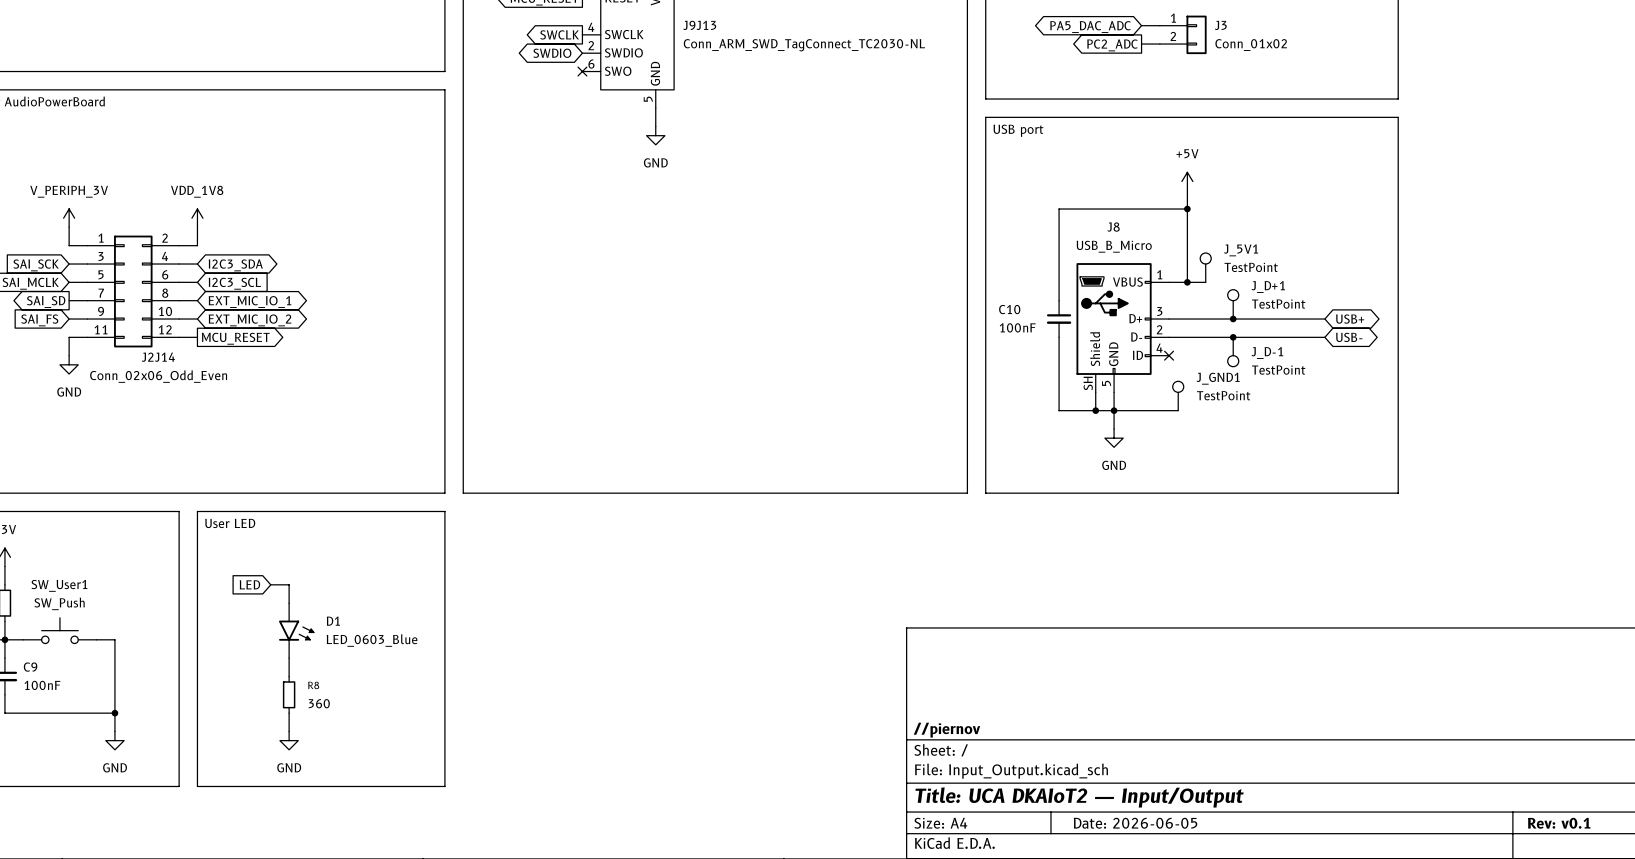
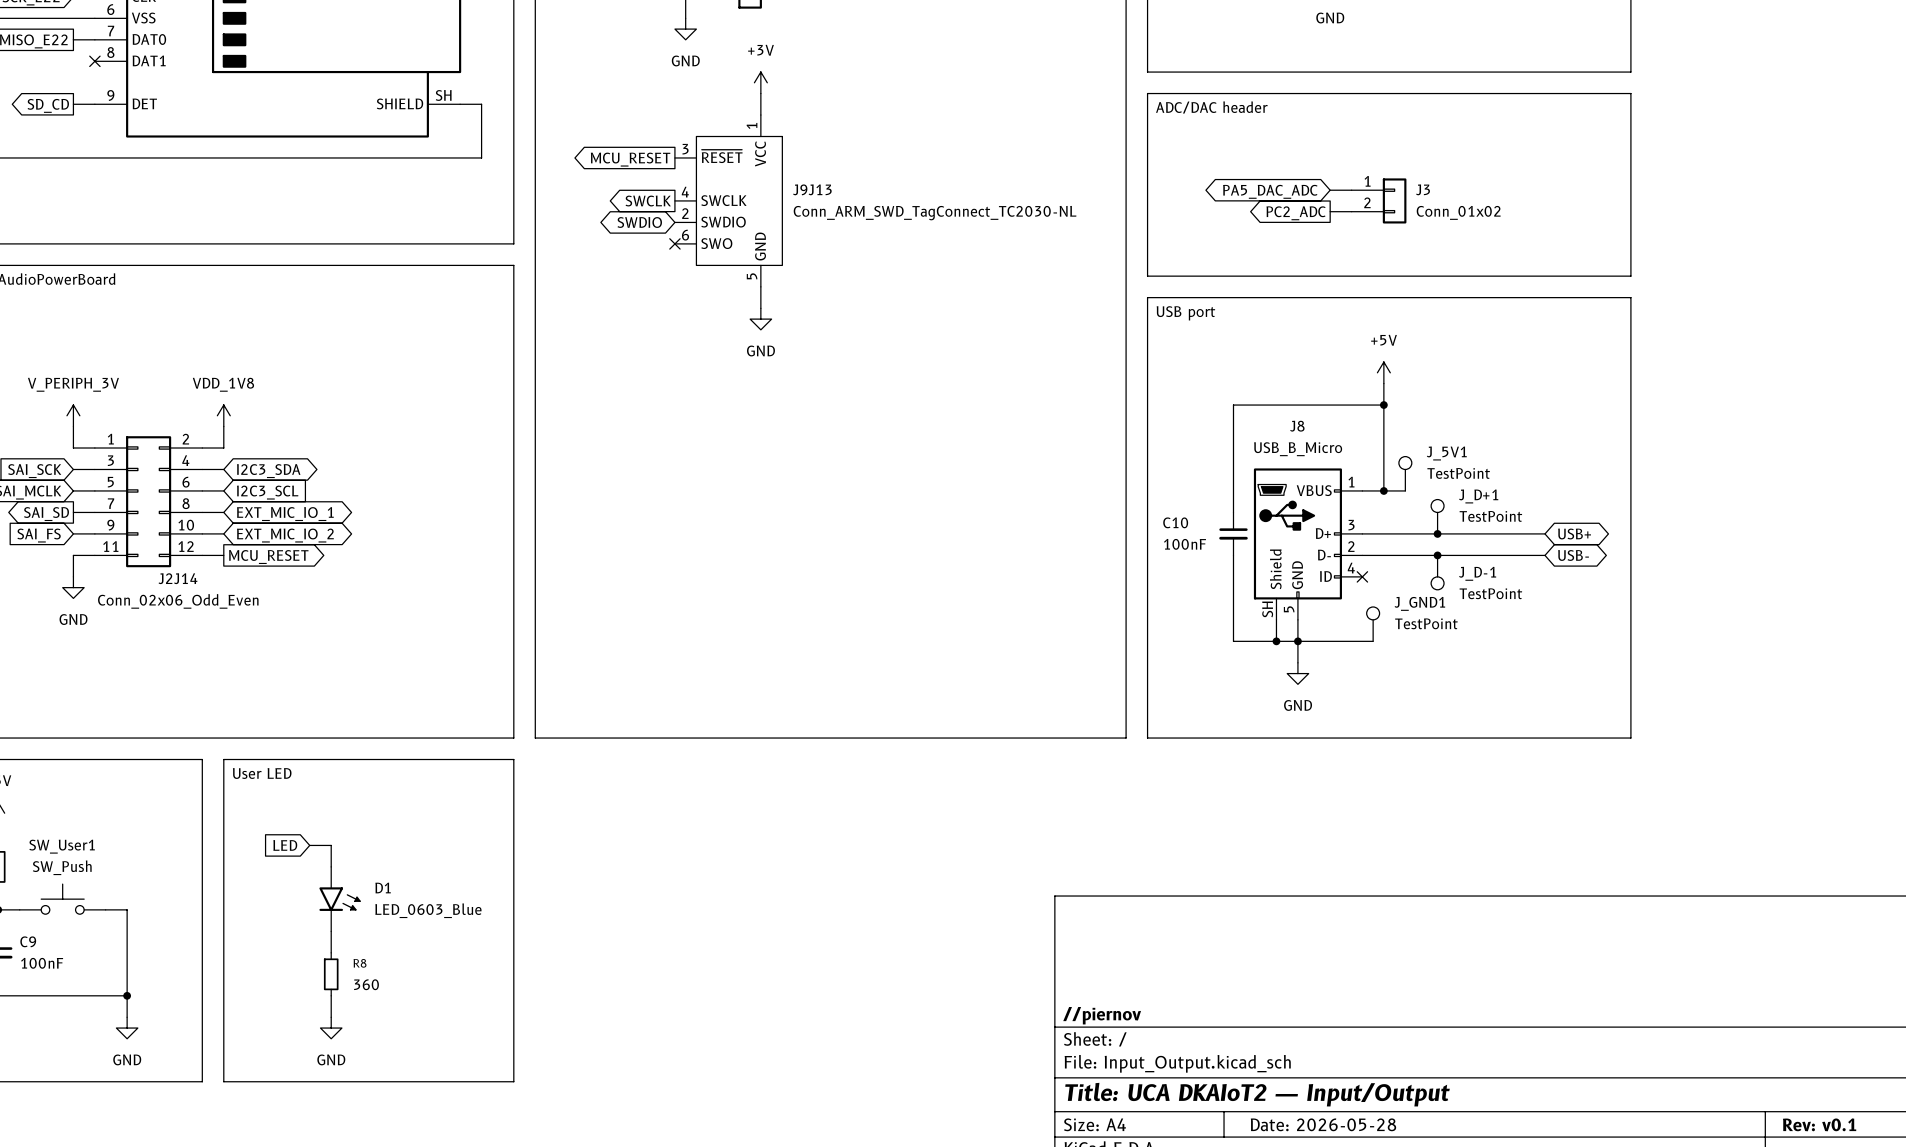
title block: Date: 2026-06-05 (1135, 823) -> Date: 2026-05-28 (1323, 1124)

